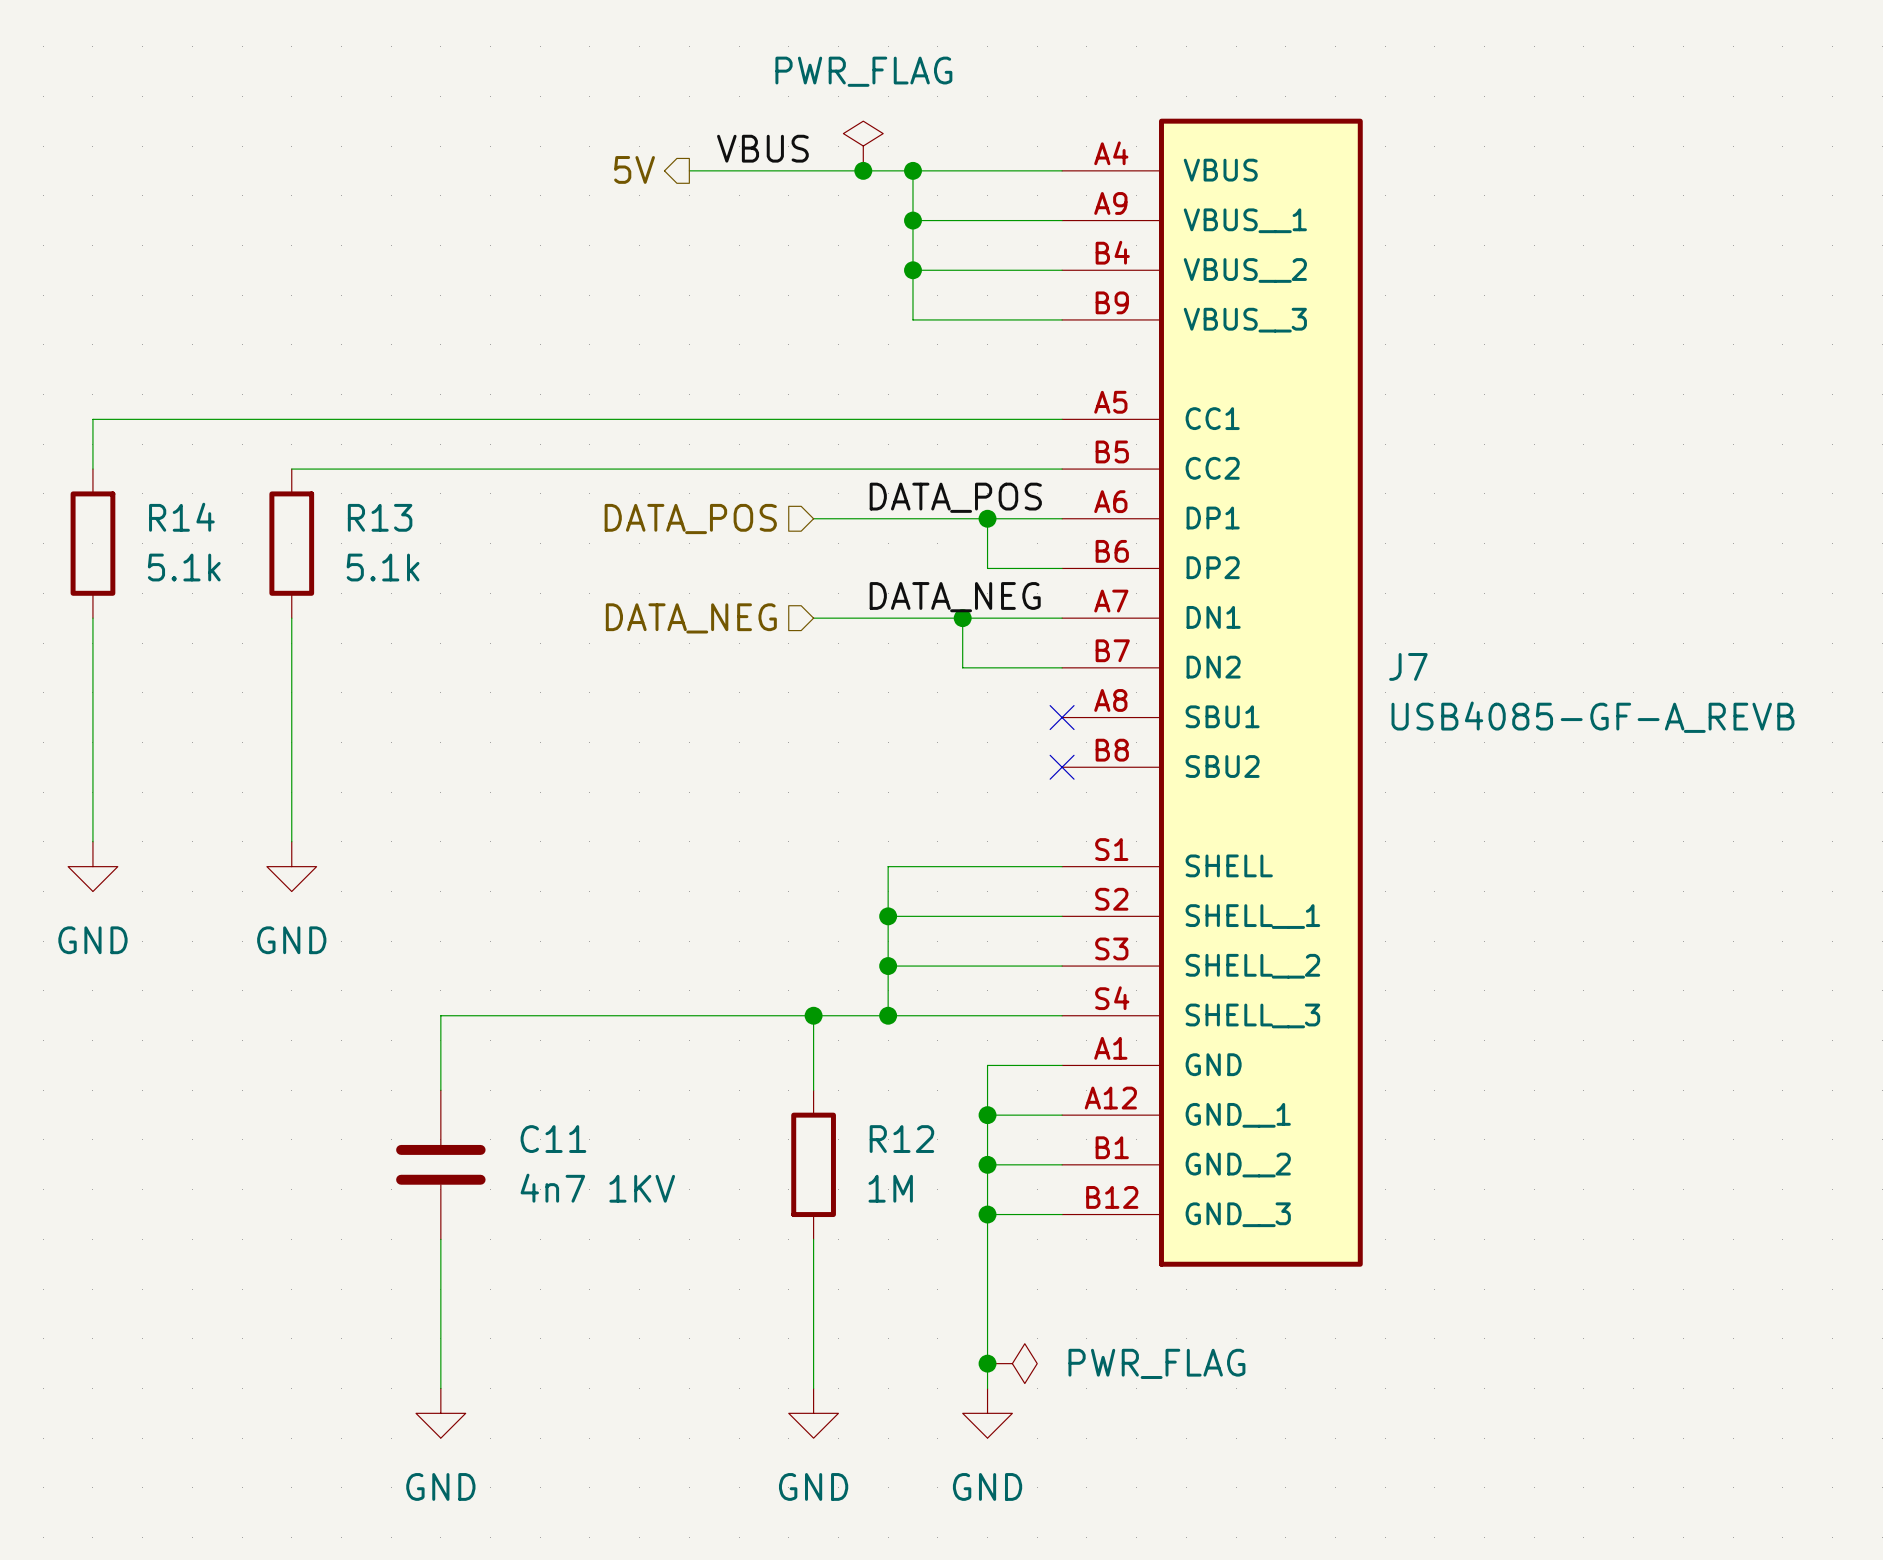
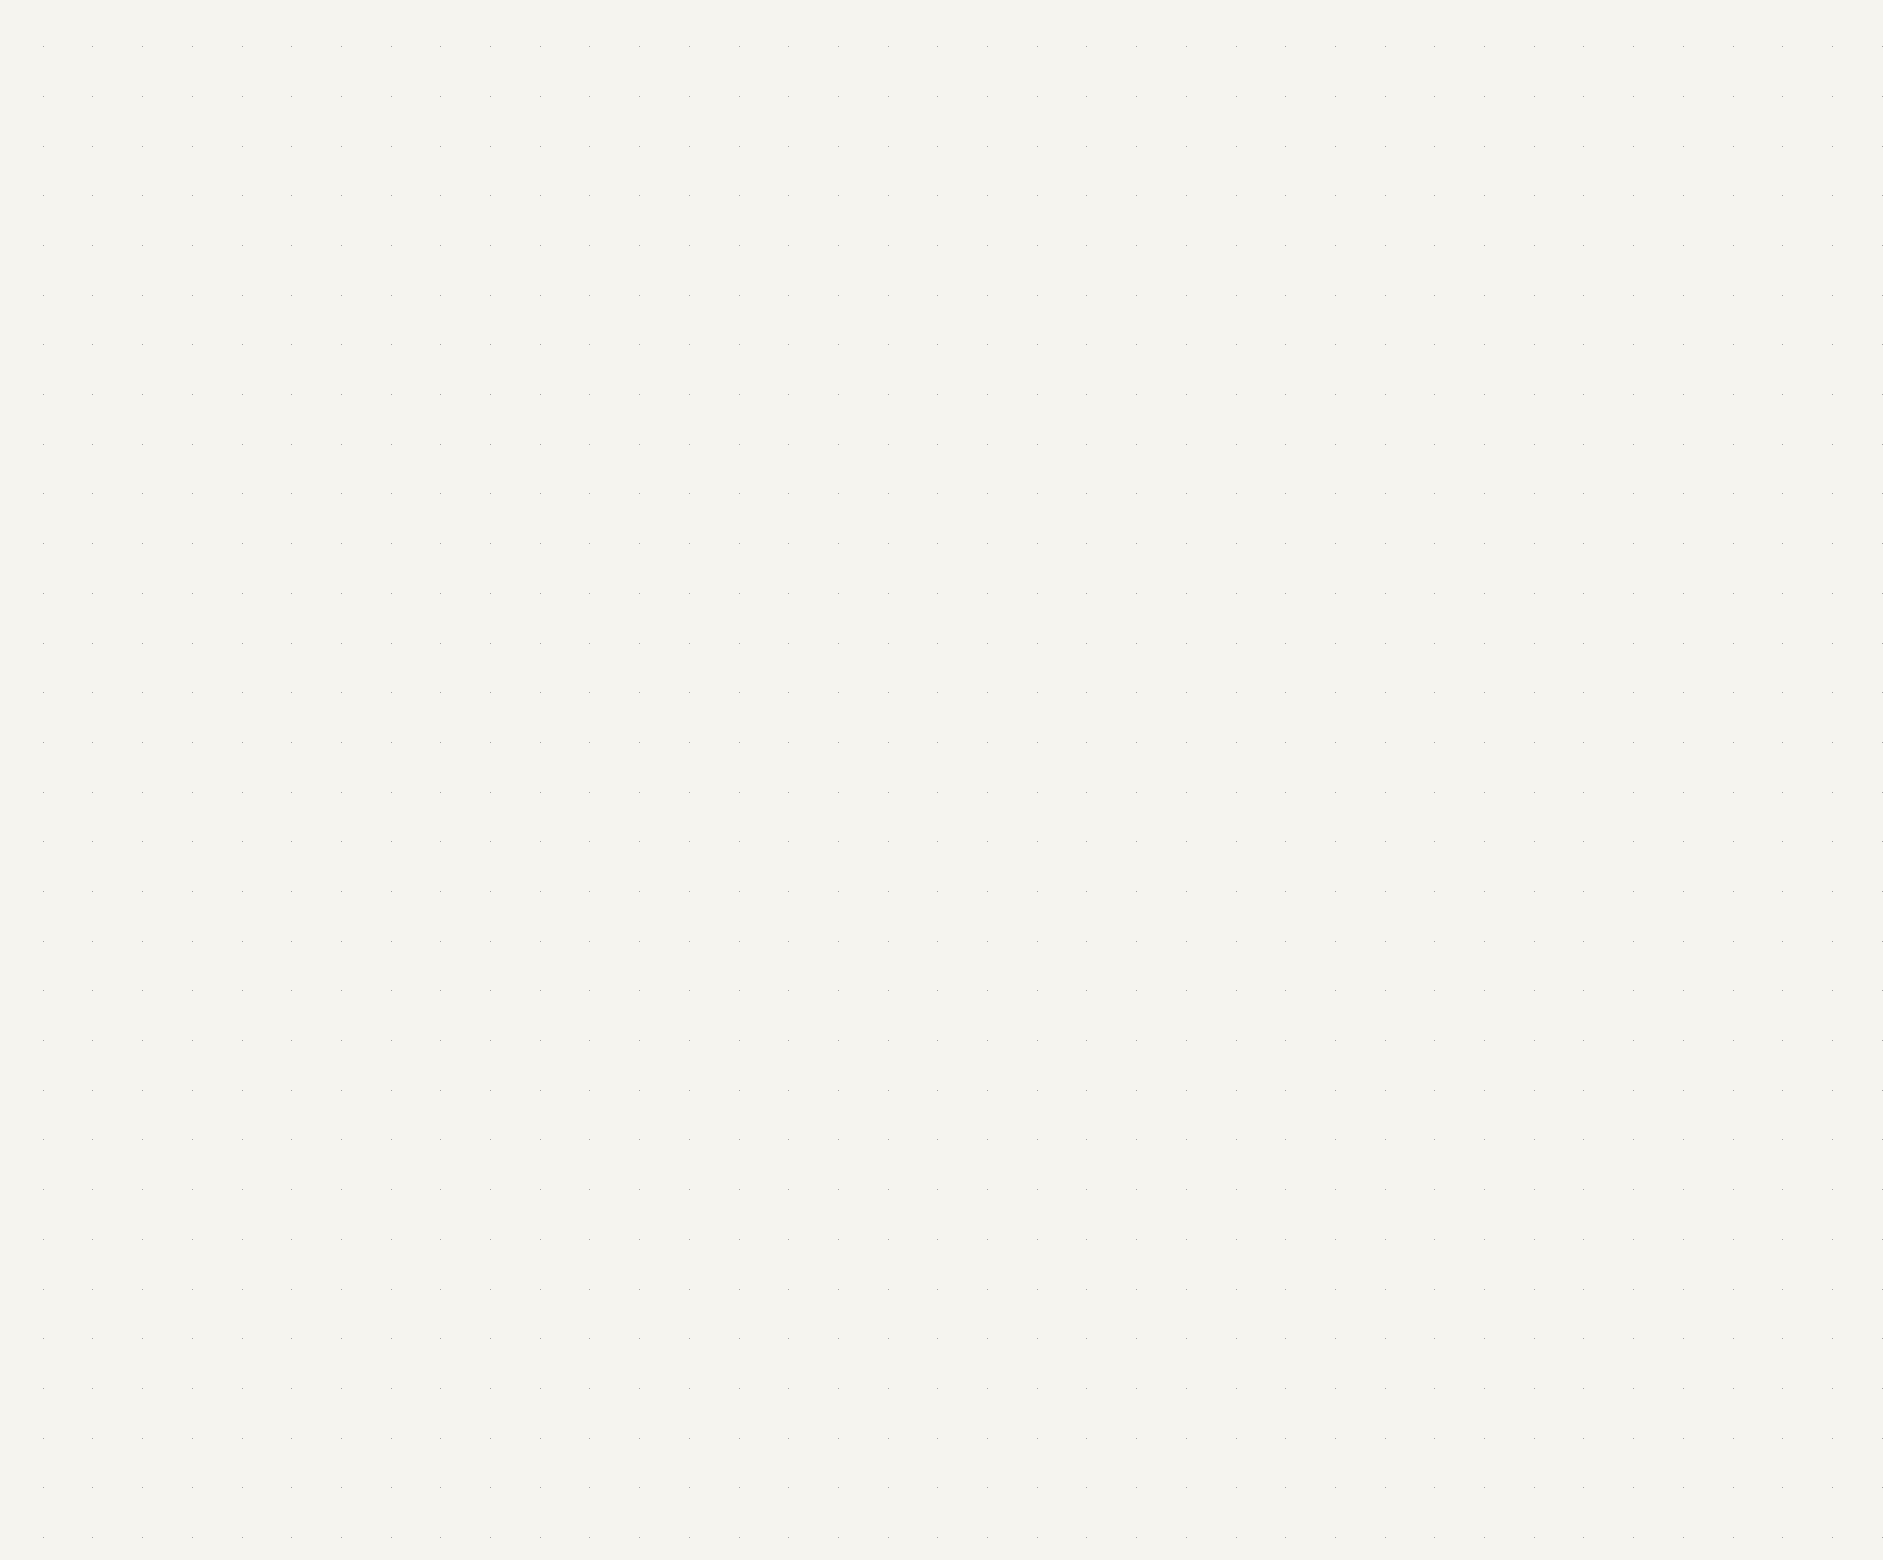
power symbol: PWR_FLAG (863, 146) -> none
label: VBUS (762, 148) -> none
hierarchical label: 5V (634, 169) -> none
wire: (689, 170) (1062, 170) -> none
junction: (863, 170) -> none
wire: (912, 170) (912, 319) (1062, 319) -> none
junction: (912, 170) -> none
wire: (912, 220) (1062, 220) -> none
junction: (912, 220) -> none
wire: (912, 270) (1062, 270) -> none
junction: (912, 270) -> none
wire: (1062, 419) (92, 419) (92, 469) -> none
wire: (291, 469) (1062, 469) -> none
label: DATA_POS (955, 497) -> none
wire: (813, 518) (1062, 518) -> none
wire: (987, 518) (987, 568) (1062, 568) -> none
junction: (987, 518) -> none
hierarchical label: DATA_POS (690, 519) -> none
R14: 5.1k (92, 543) -> none
R13: 5.1k (291, 543) -> none
label: DATA_NEG (955, 597) -> none
wire: (92, 618) (92, 841) -> none
wire: (291, 618) (291, 841) -> none
hierarchical label: DATA_NEG (691, 618) -> none
wire: (813, 618) (1062, 618) -> none
wire: (962, 618) (962, 667) (1062, 667) -> none
junction: (962, 618) -> none
J7: USB4085-GF-A_REVB (1212, 692) -> none
no-connect mark: (1062, 717) -> none
no-connect mark: (1062, 767) -> none
power symbol: GND (92, 866) -> none
power symbol: GND (291, 866) -> none
wire: (1062, 866) (888, 866) (888, 1015) -> none
wire: (888, 916) (1062, 916) -> none
junction: (888, 916) -> none
wire: (888, 966) (1062, 966) -> none
junction: (888, 966) -> none
wire: (813, 1015) (813, 1090) -> none
junction: (813, 1015) -> none
junction: (888, 1015) -> none
wire: (1062, 1015) (440, 1015) (440, 1090) -> none
wire: (1062, 1065) (987, 1065) (987, 1388) -> none
wire: (987, 1115) (1062, 1115) -> none
junction: (987, 1115) -> none
C11: 4n7 1KV (440, 1164) -> none
R12: 1M (813, 1164) -> none
wire: (987, 1164) (1062, 1164) -> none
junction: (987, 1164) -> none
wire: (987, 1214) (1062, 1214) -> none
junction: (987, 1214) -> none
wire: (440, 1239) (440, 1388) -> none
wire: (813, 1239) (813, 1388) -> none
junction: (987, 1363) -> none
power symbol: PWR_FLAG (1012, 1363) -> none
power symbol: GND (440, 1413) -> none
power symbol: GND (813, 1413) -> none
power symbol: GND (987, 1413) -> none

